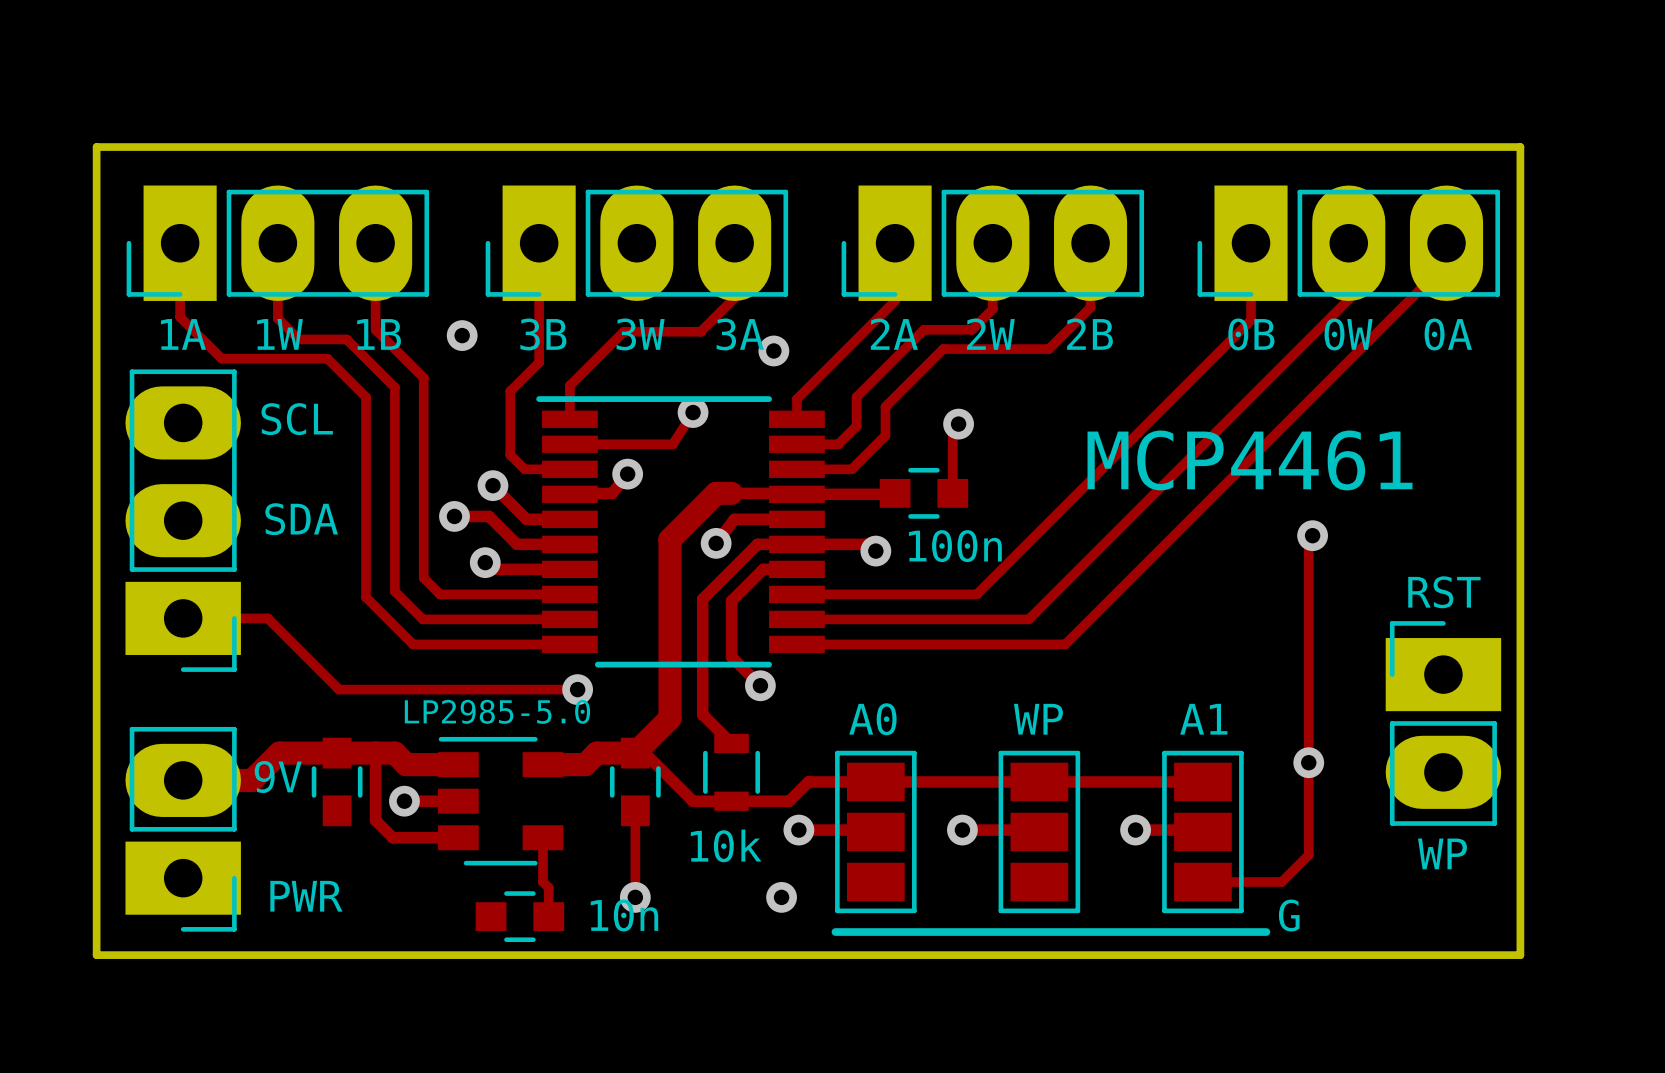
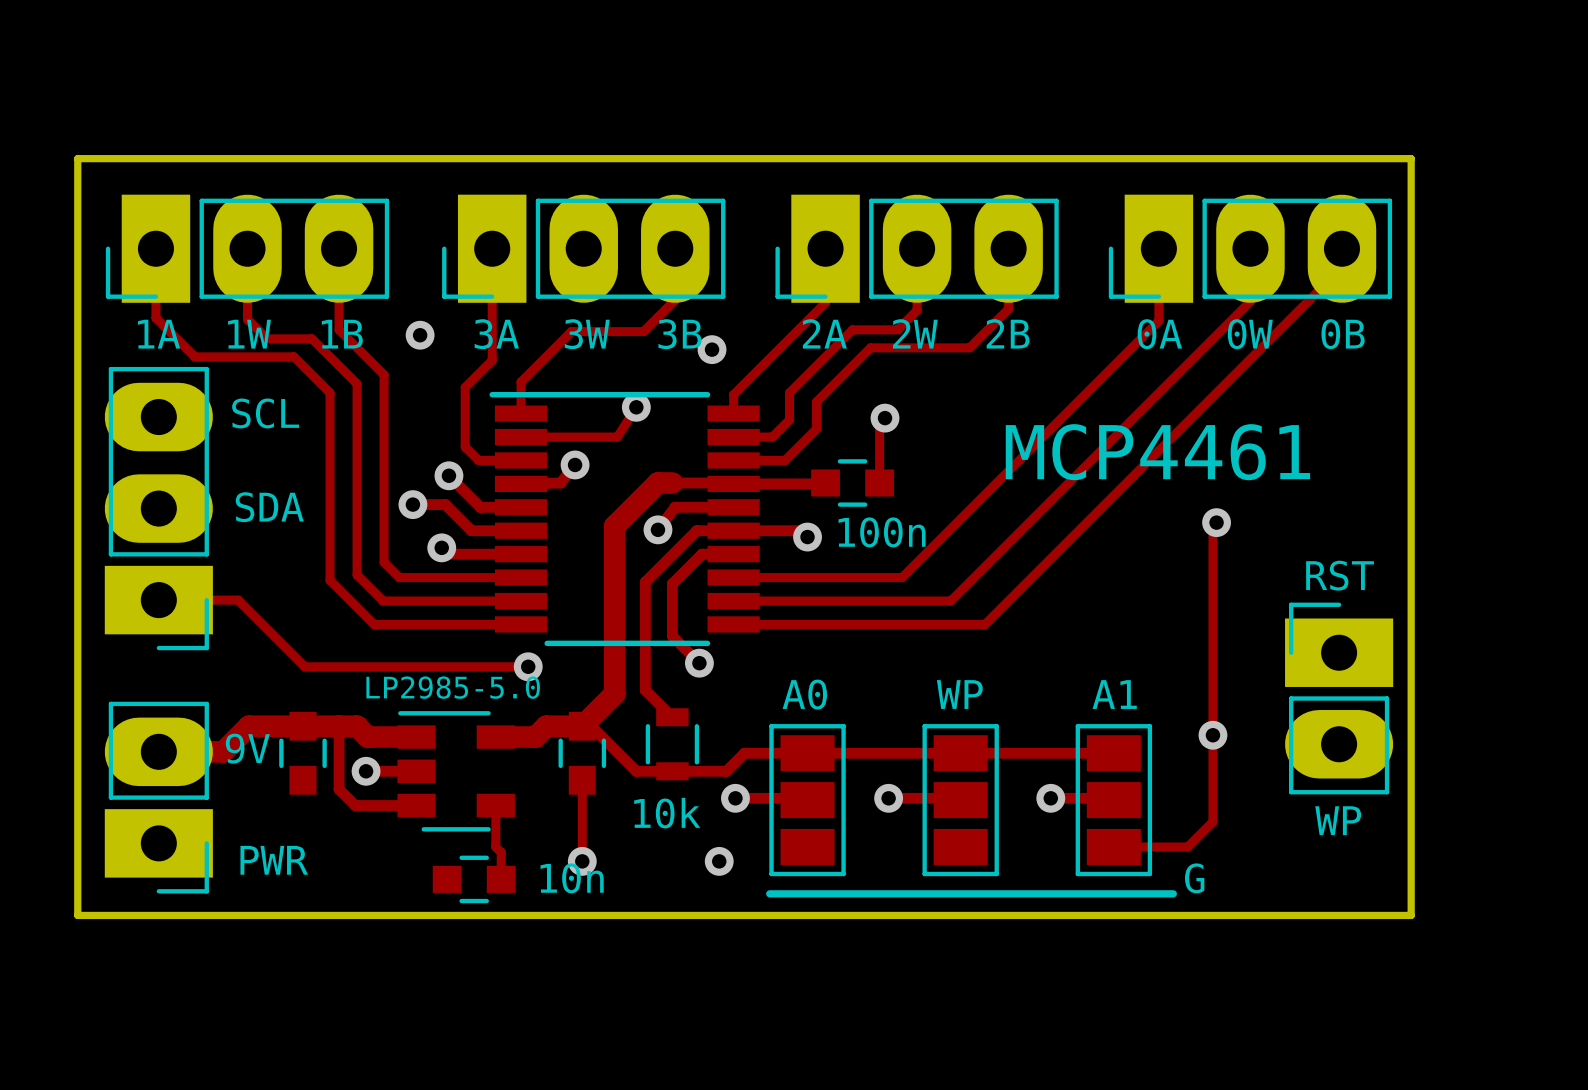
text: 3B (543, 334) -> 3A (496, 334)
text: 3A (740, 334) -> 3B (679, 334)
text: 0B (1251, 334) -> 0A (1159, 334)
text: 0A (1448, 334) -> 0B (1343, 334)

